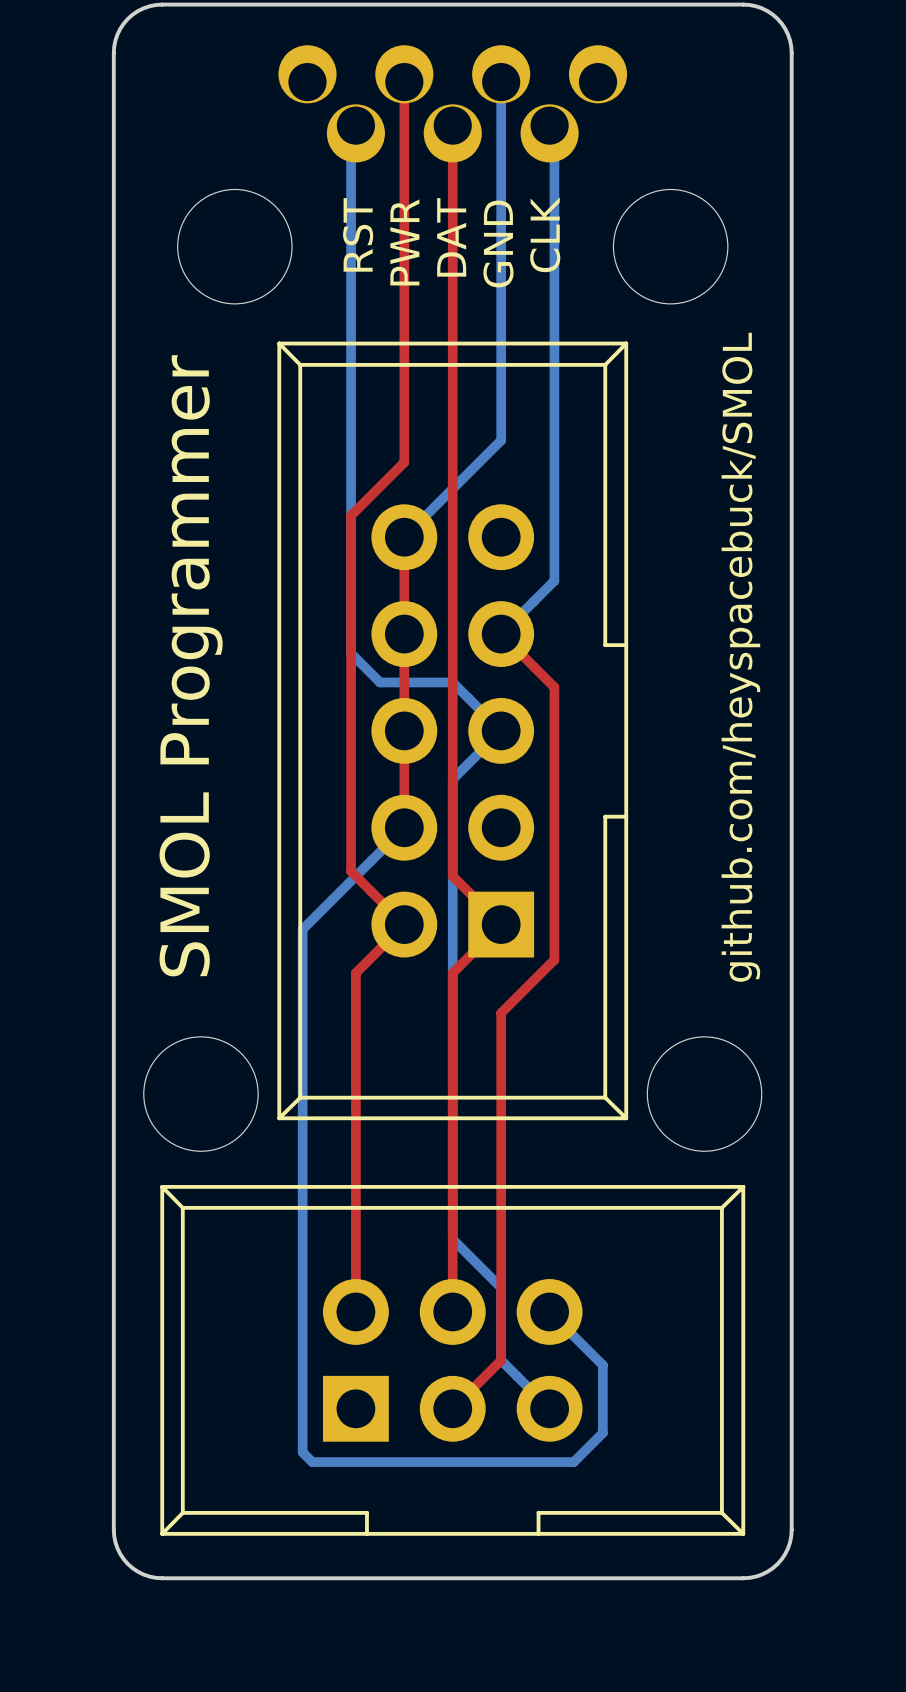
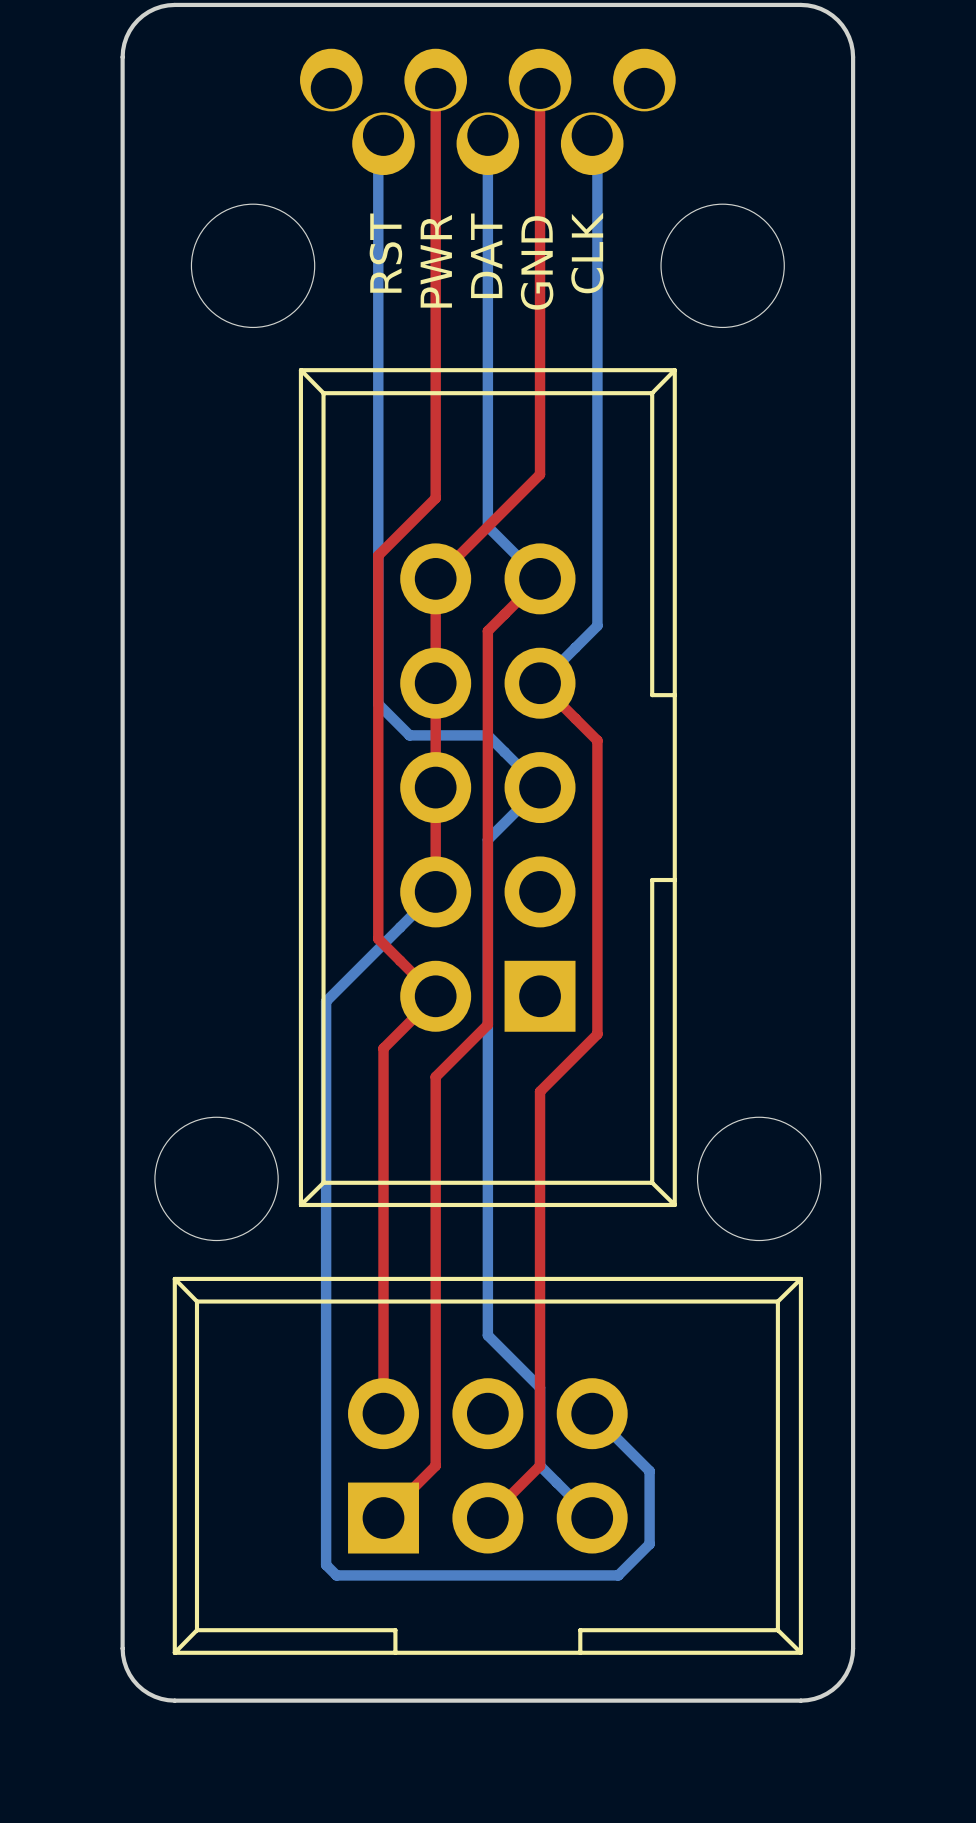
top track: none -> (540, 88) (540, 474) (435, 578)
bottom track: (501, 82) (501, 440) (404, 537) -> none
top track: (452, 125) (452, 585) -> (540, 578) (487, 631)
bottom track: none -> (487, 135) (487, 526) (540, 578)
text: github.com/heyspacebuck/SMOL (740, 657) -> none
text: SMOL Programmer (191, 665) -> none
top track: (452, 876) (501, 924) (452, 973) (452, 1311) -> (487, 944) (487, 1024) (435, 1076) (435, 1465) (383, 1518)

